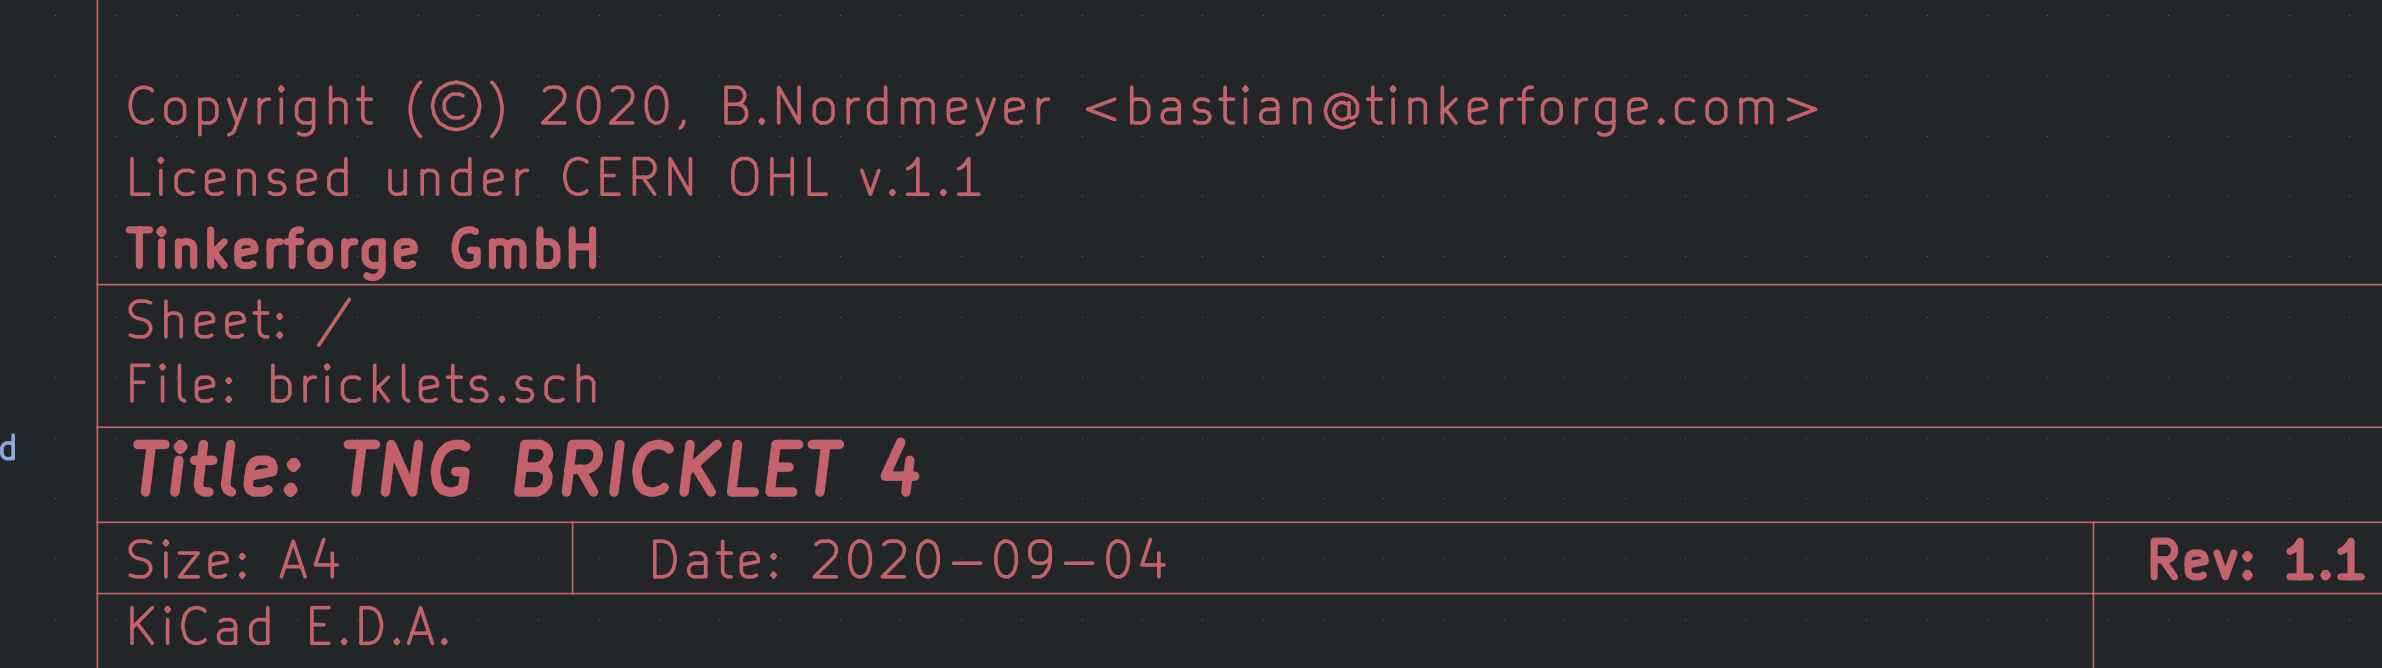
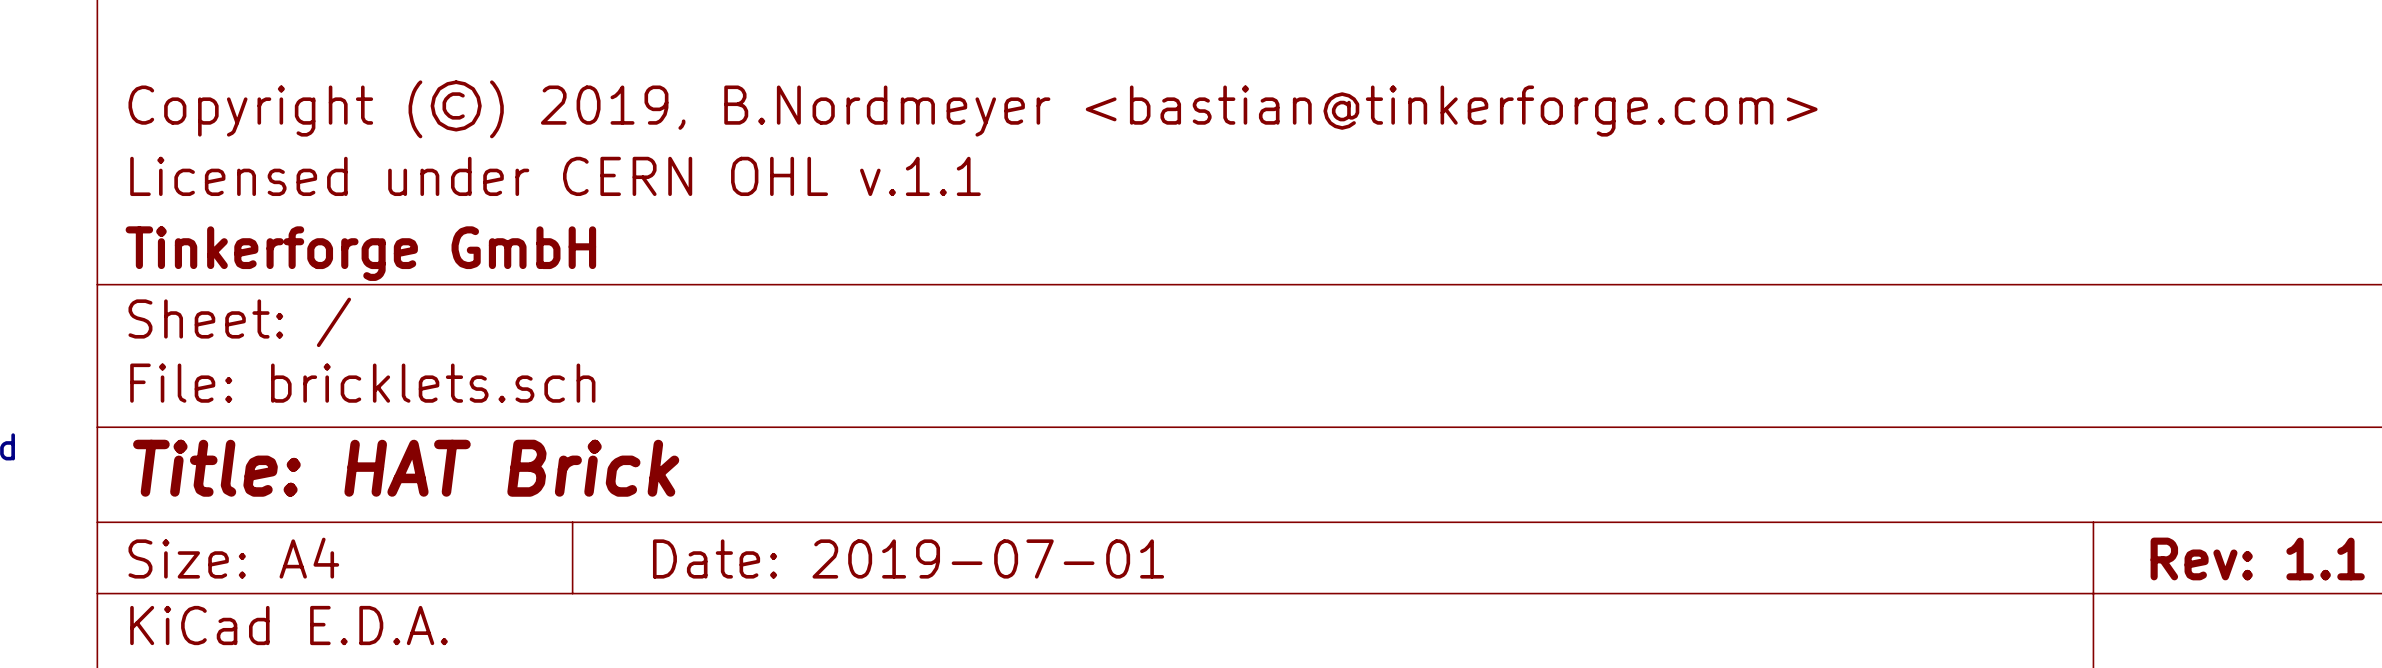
title block: Copyright (©) 2020, B.Nordmeyer <bastian@tinkerforge.com> (973, 109) -> Copyright (©) 2019, B.Nordmeyer <bastian@tinkerforge.com> (973, 109)
title block: Title: TNG BRICKLET 4 (526, 467) -> Title: HAT Brick (406, 468)
title block: Date: 2020-09-04 (909, 558) -> Date: 2019-07-01 (908, 558)

